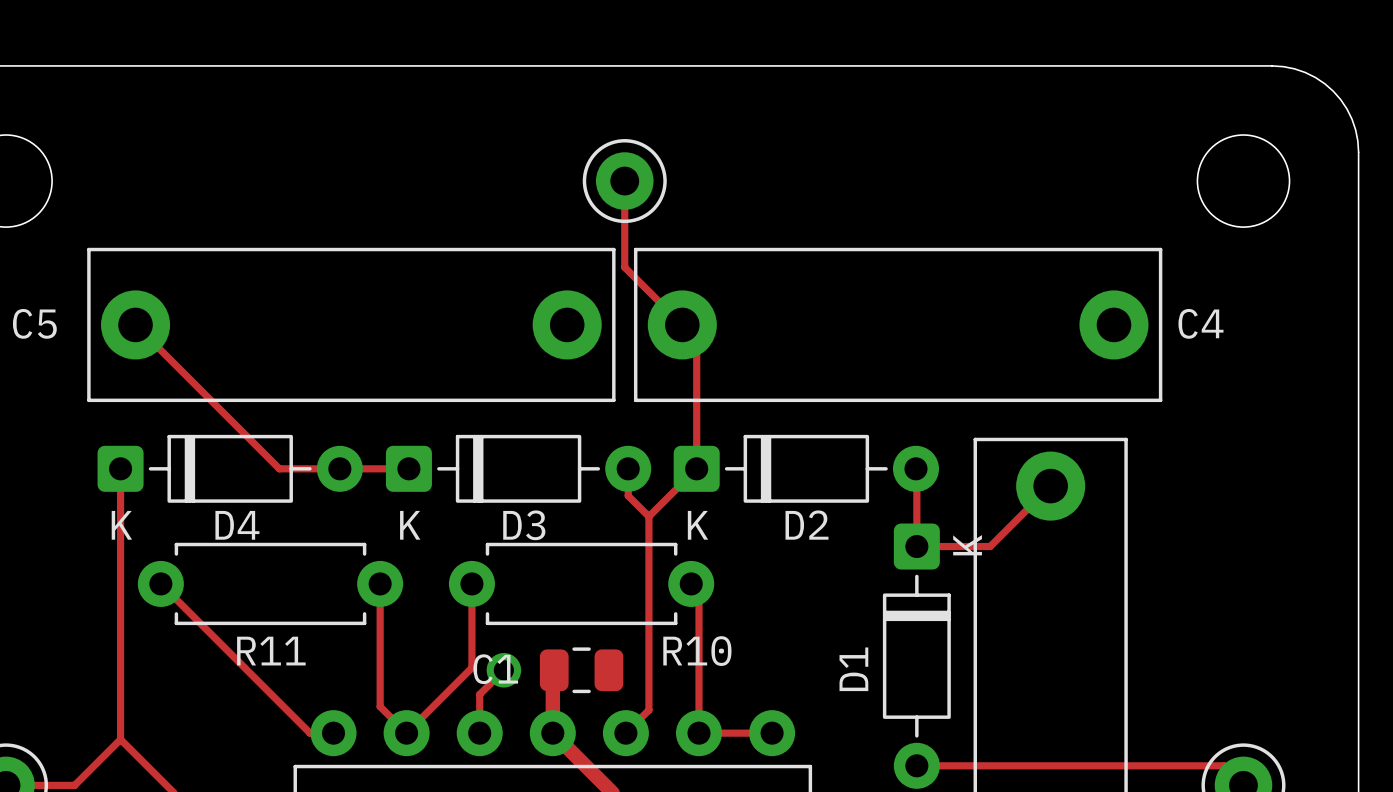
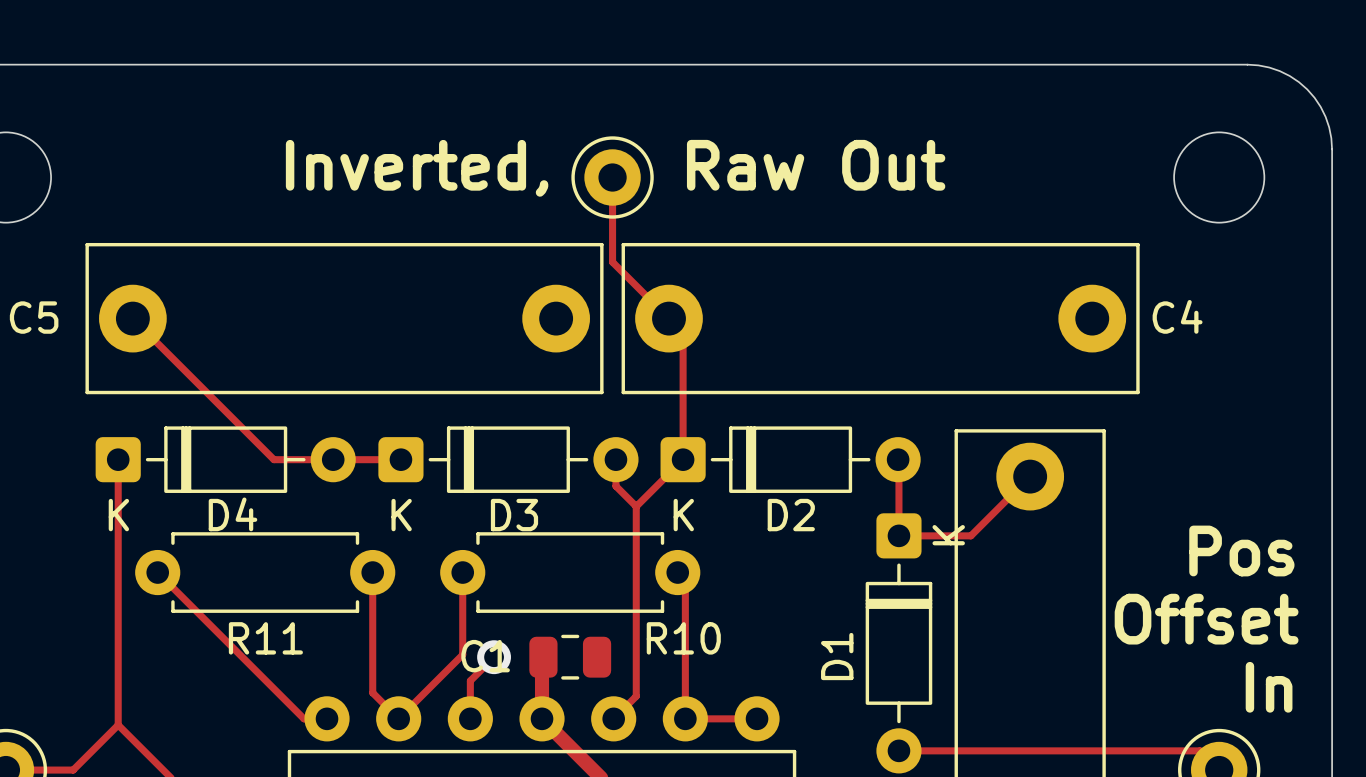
text: none -> Inverted, Raw Out (615, 168)
text: none -> Pos (1241, 551)
text: none -> Offset (1206, 619)
text: none -> In (1269, 687)

